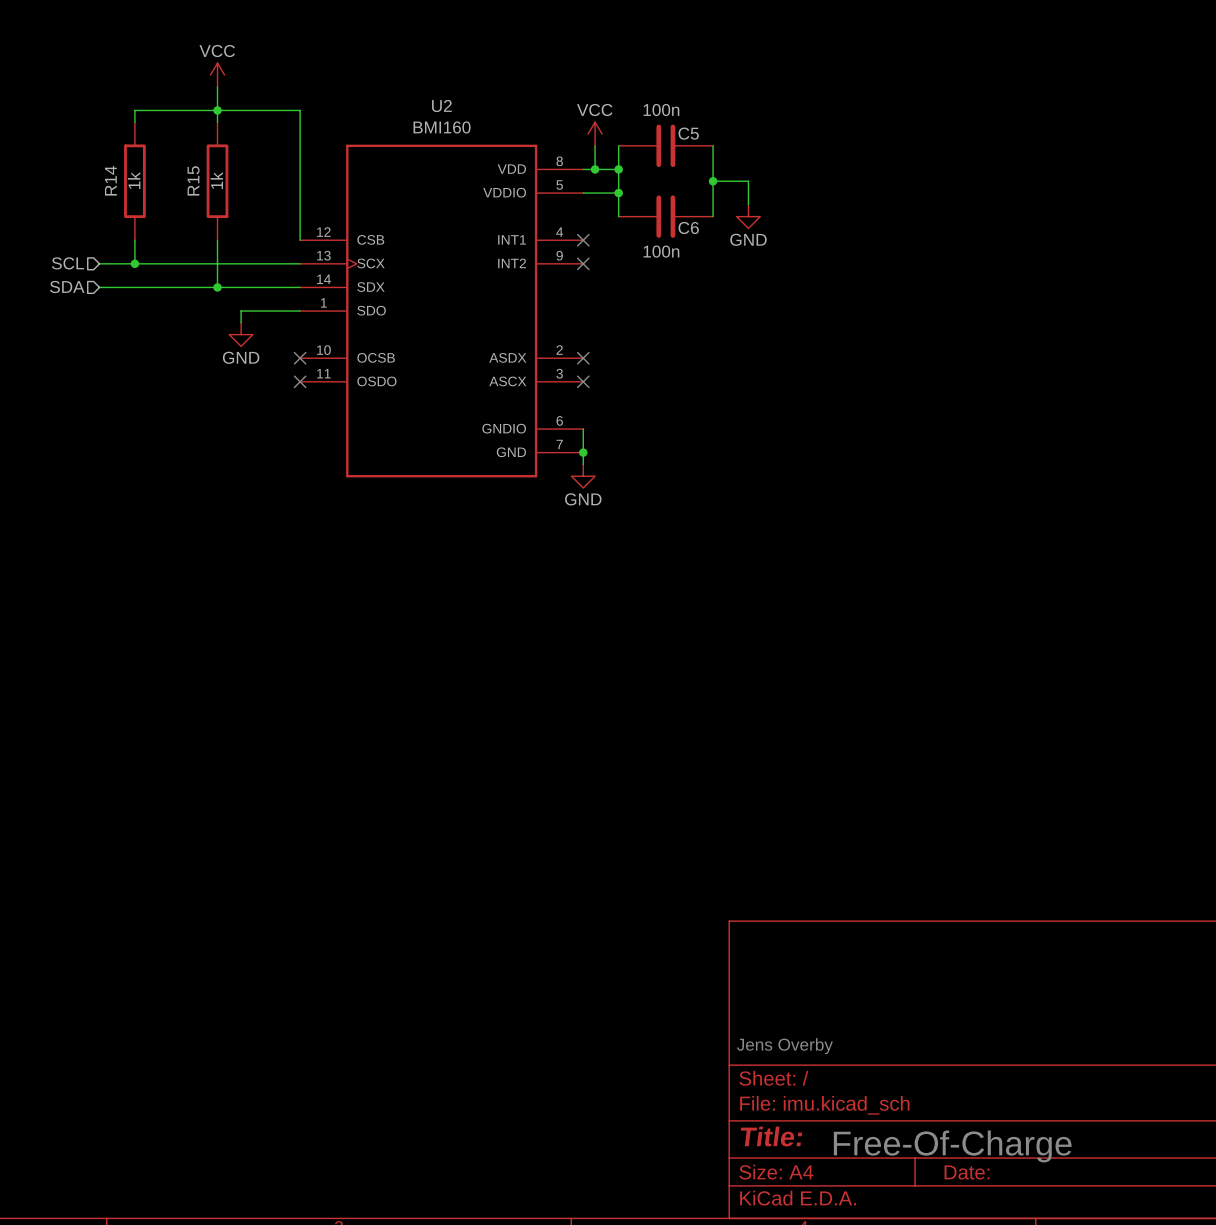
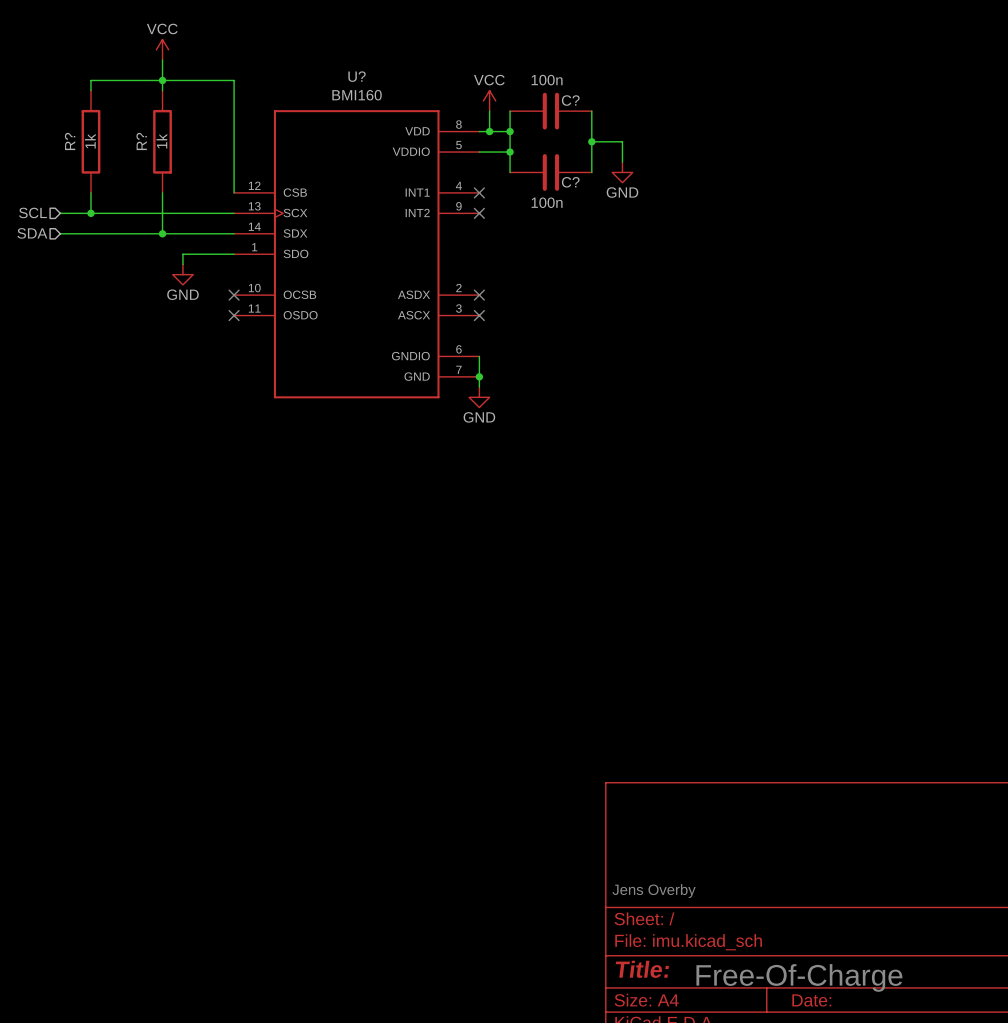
U2 name: U2 (441, 106) -> U? (357, 76)
C5 name: C5 (688, 133) -> C? (570, 100)
R14 name: R14 (110, 180) -> R? (70, 141)
R15 name: R15 (193, 180) -> R? (141, 141)
C6 name: C6 (688, 227) -> C? (570, 182)

